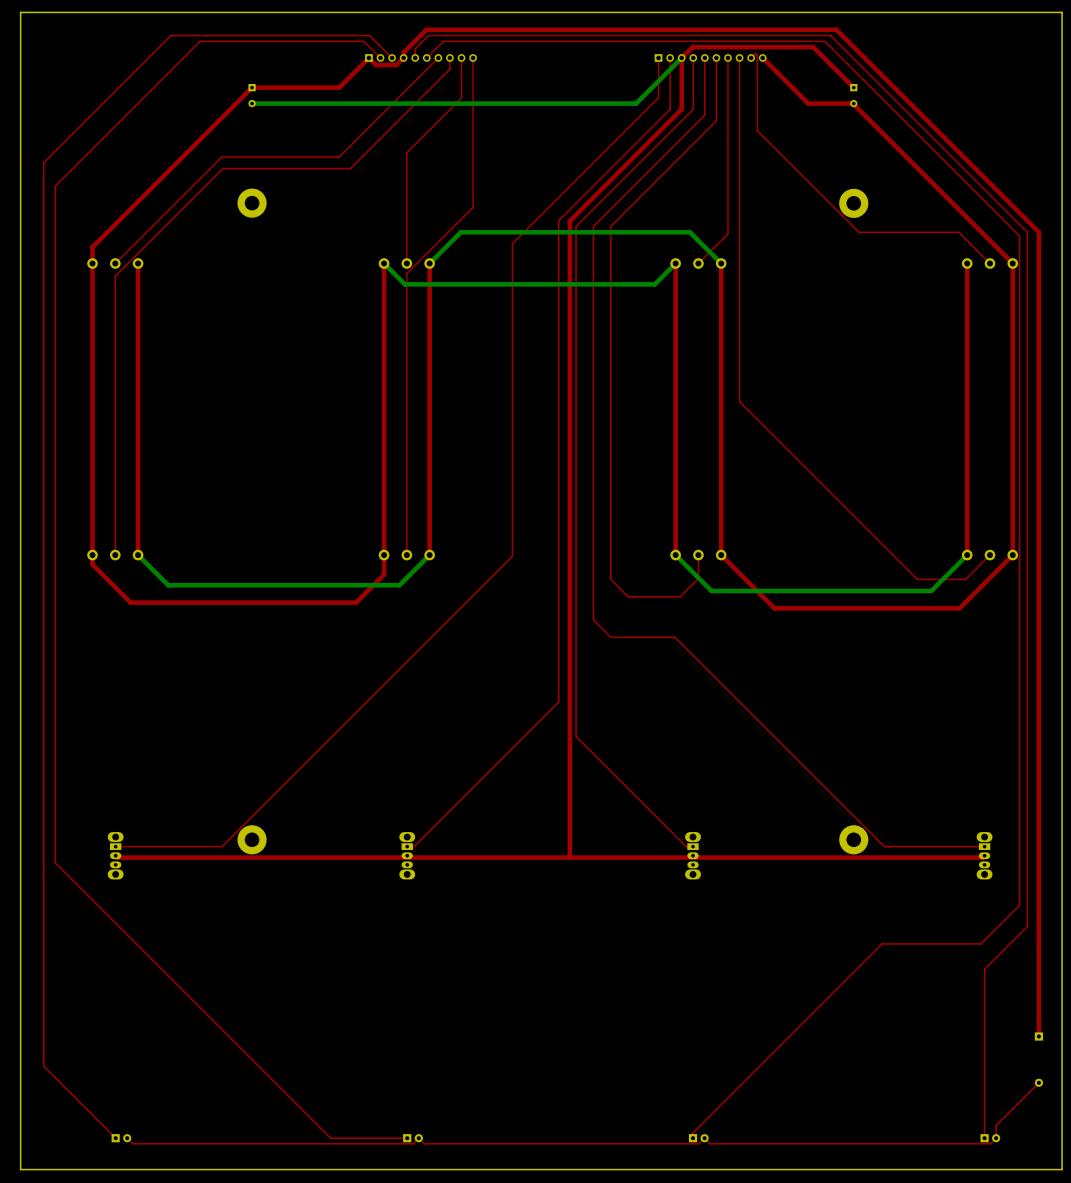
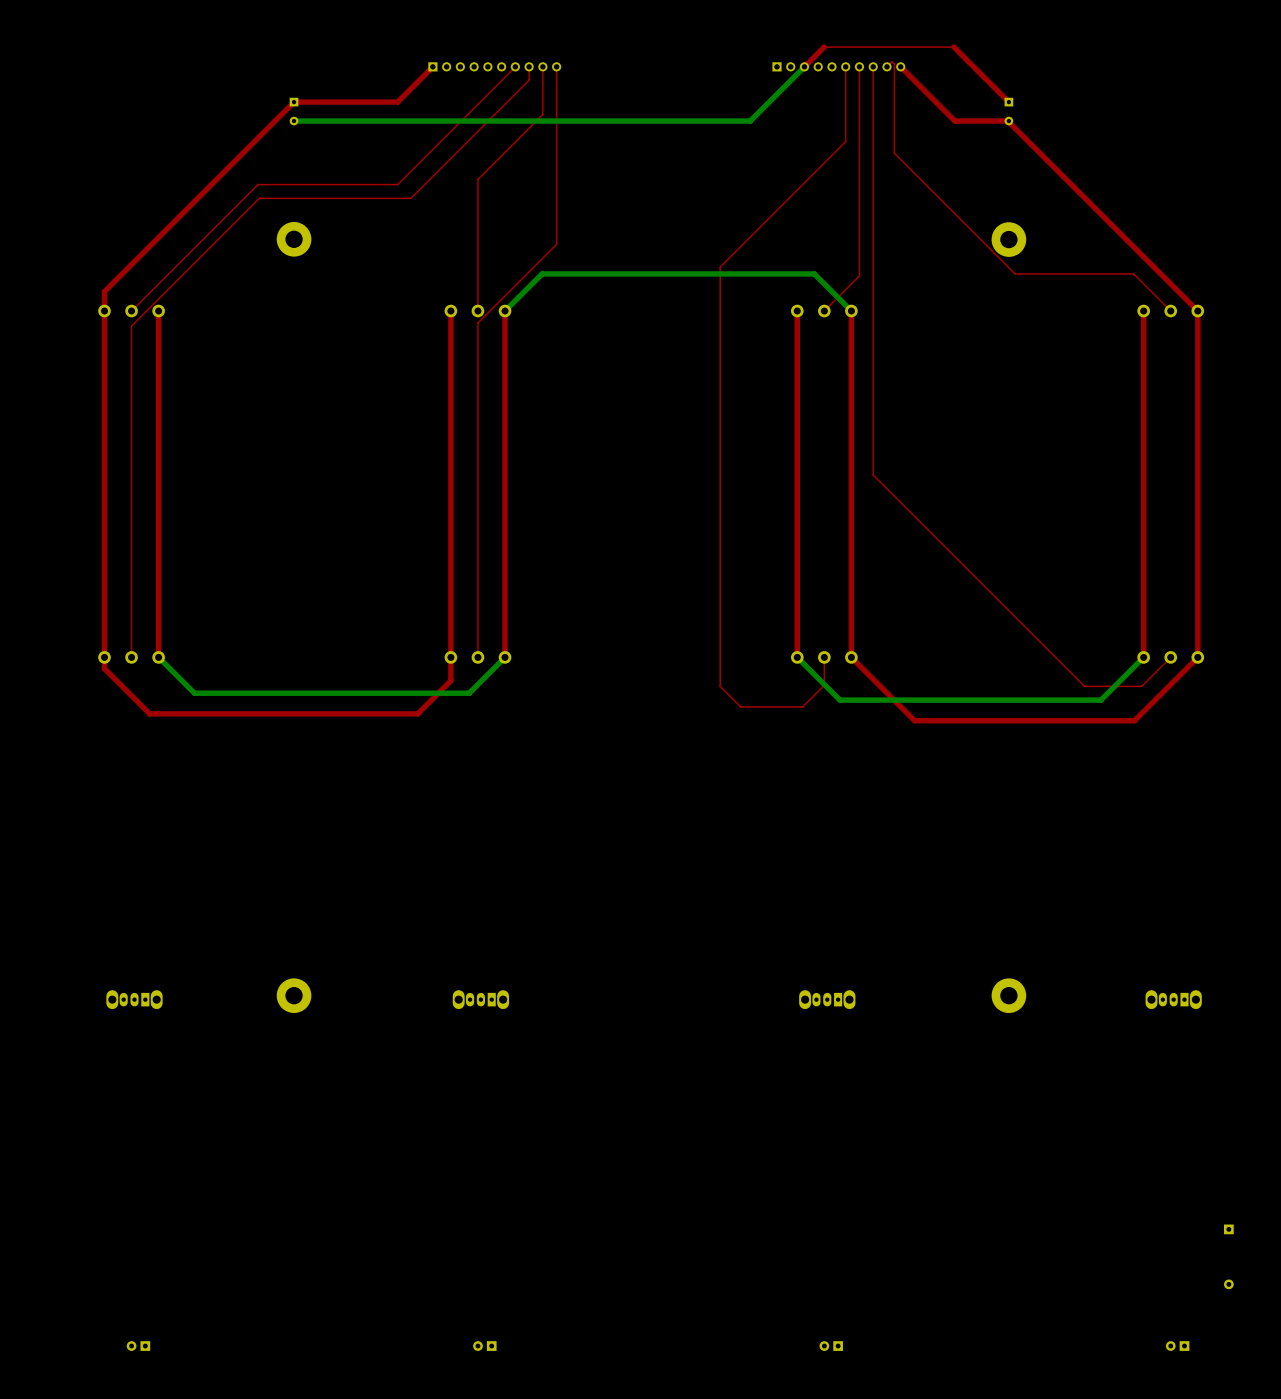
board edge: (1062, 12) (1062, 1169) (20, 1169) (20, 12) (1062, 12) -> none
top track: (698, 41) (443, 41) (426, 57) -> none
top track: (807, 41) (824, 41) (1019, 236) (1019, 905) (981, 943) (882, 943) (693, 1132) (693, 1138) -> (953, 47) (960, 53)
top track: (813, 47) (692, 47) -> (824, 47) (817, 53)
top track: (368, 57) (375, 65) (396, 65) (403, 57) (403, 52) (426, 29) (836, 29) (1038, 232) (1038, 1036) -> none
top track: (380, 57) (363, 41) (199, 41) (55, 186) (55, 862) (330, 1138) (407, 1138) -> none
top track: (392, 57) (369, 35) (171, 35) (43, 162) (43, 1066) (115, 1138) -> none
top track: (415, 57) (415, 48) (428, 35) (830, 35) (1027, 232) (1027, 926) (984, 969) (984, 1138) -> none
top track: (658, 57) (658, 97) (512, 243) (512, 556) (222, 846) (115, 846) -> none
top track: (670, 57) (670, 109) (558, 220) (558, 701) (414, 846) (407, 846) -> none
top track: (681, 57) (681, 109) (569, 221) (569, 857) -> none
top track: (693, 57) (693, 109) (576, 226) (576, 736) (686, 846) (693, 846) -> none
top track: (704, 57) (704, 115) (593, 226) (593, 619) (610, 637) (675, 637) (884, 846) (984, 846) -> none
bottom track: (675, 263) (654, 284) (404, 284) (384, 263) -> none
part rotation: 0° (115, 855) -> 90° clockwise (134, 999)
part rotation: 0° (407, 855) -> 90° clockwise (480, 999)
part rotation: 0° (693, 855) -> 90° clockwise (827, 999)
top track: (984, 855) (982, 857) (694, 857) (693, 855) (691, 857) (409, 857) (407, 855) (405, 857) (117, 857) (115, 855) -> none
part rotation: 0° (984, 855) -> 90° clockwise (1173, 999)
top track: (1038, 1082) (996, 1125) (996, 1138) (990, 1143) (710, 1143) (704, 1138) (699, 1143) (424, 1143) (418, 1138) (413, 1143) (132, 1143) (127, 1138) -> none
part rotation: 0° (121, 1138) -> 180° (138, 1346)
part rotation: 0° (413, 1138) -> 180° (484, 1346)
part rotation: 0° (698, 1138) -> 180° (831, 1346)
part rotation: 0° (990, 1138) -> 180° (1177, 1346)

